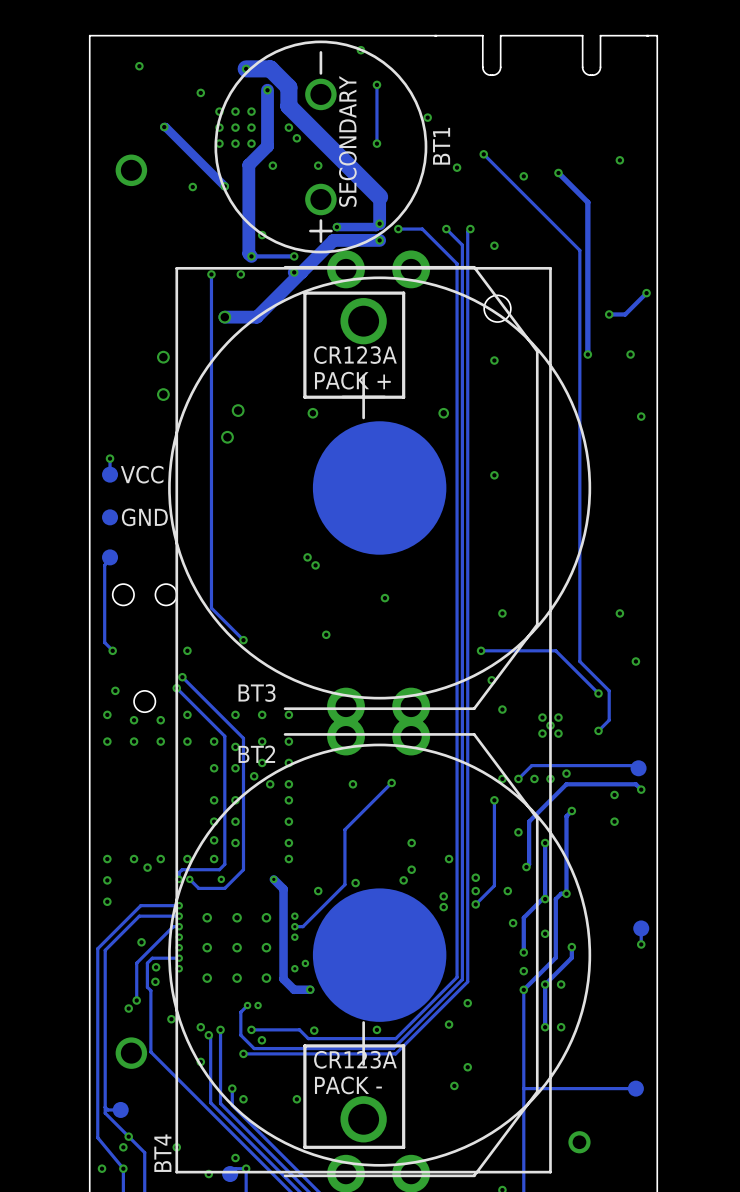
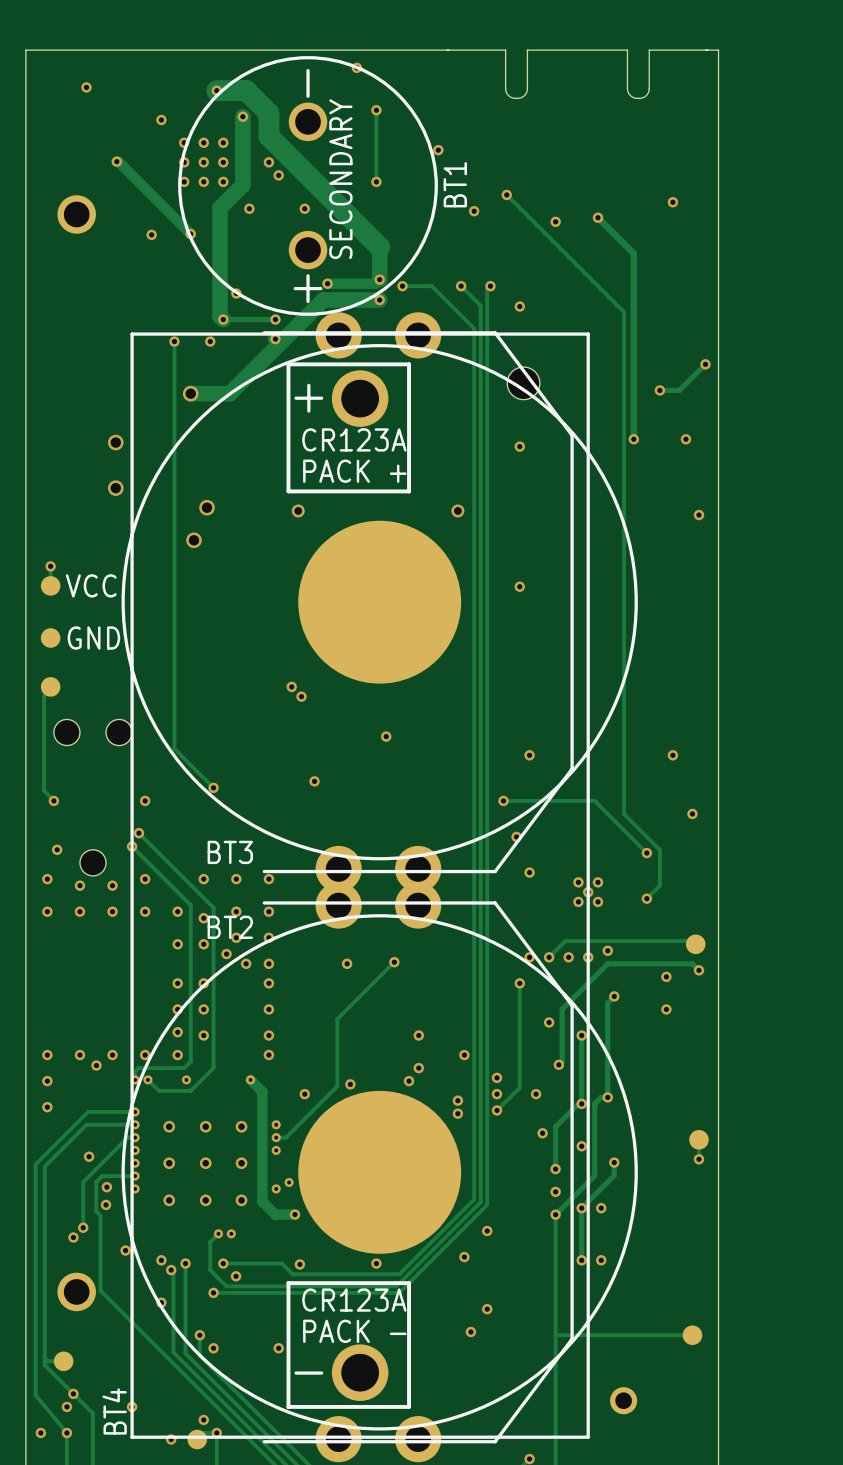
BT4 footprint: [175, 266, 552, 1174] -> [130, 332, 590, 1439]

